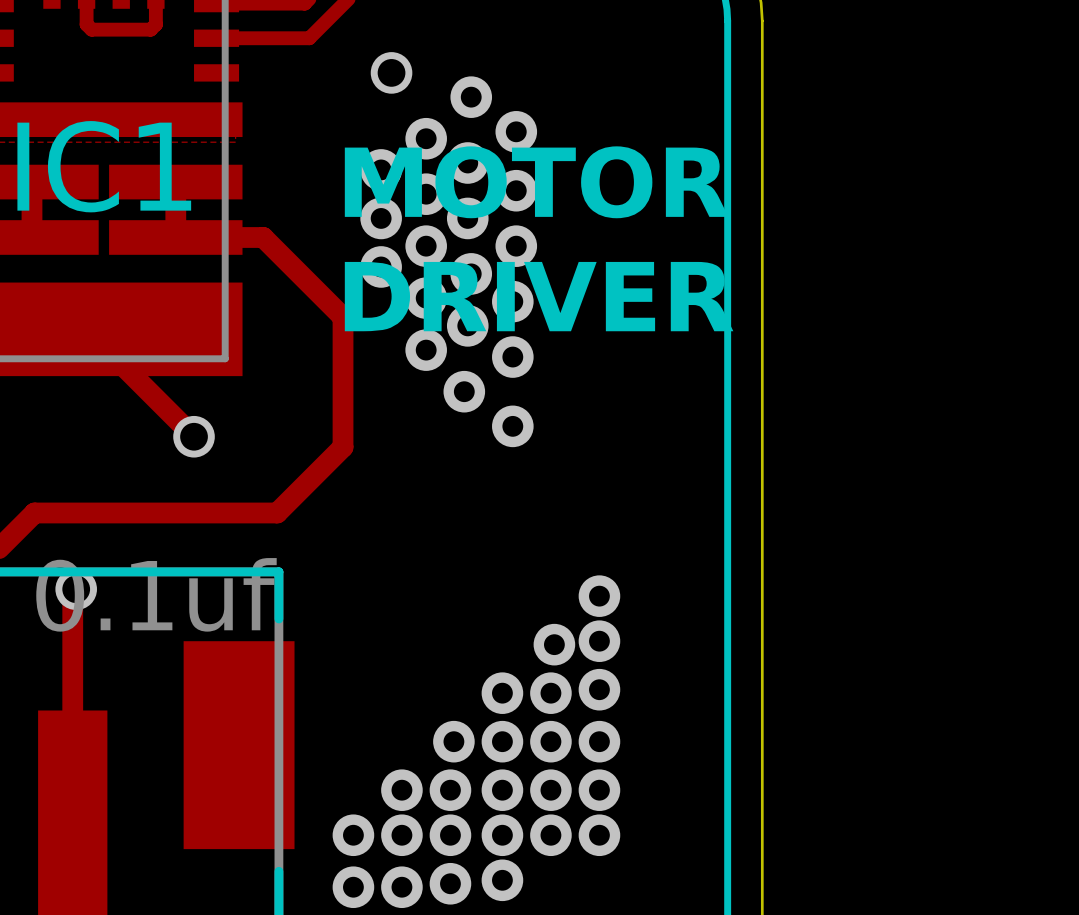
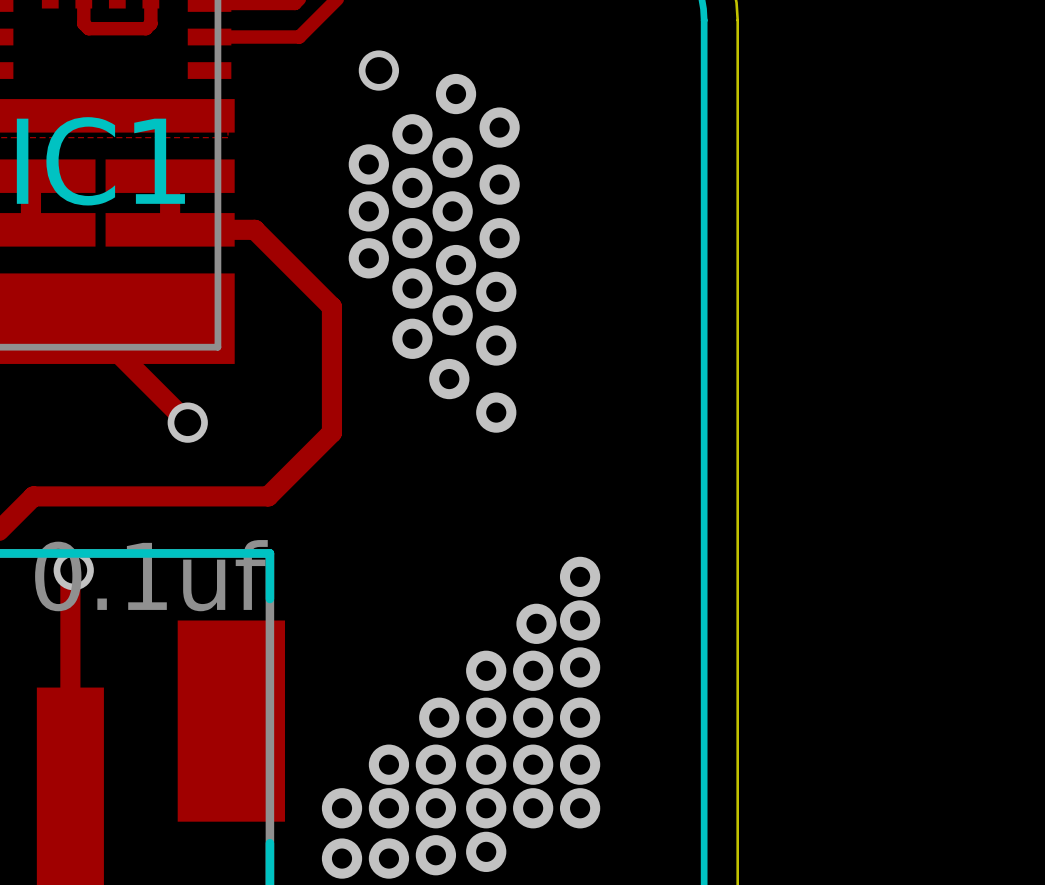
text: MOTOR (536, 182) -> none
text: DRIVER (539, 296) -> none

